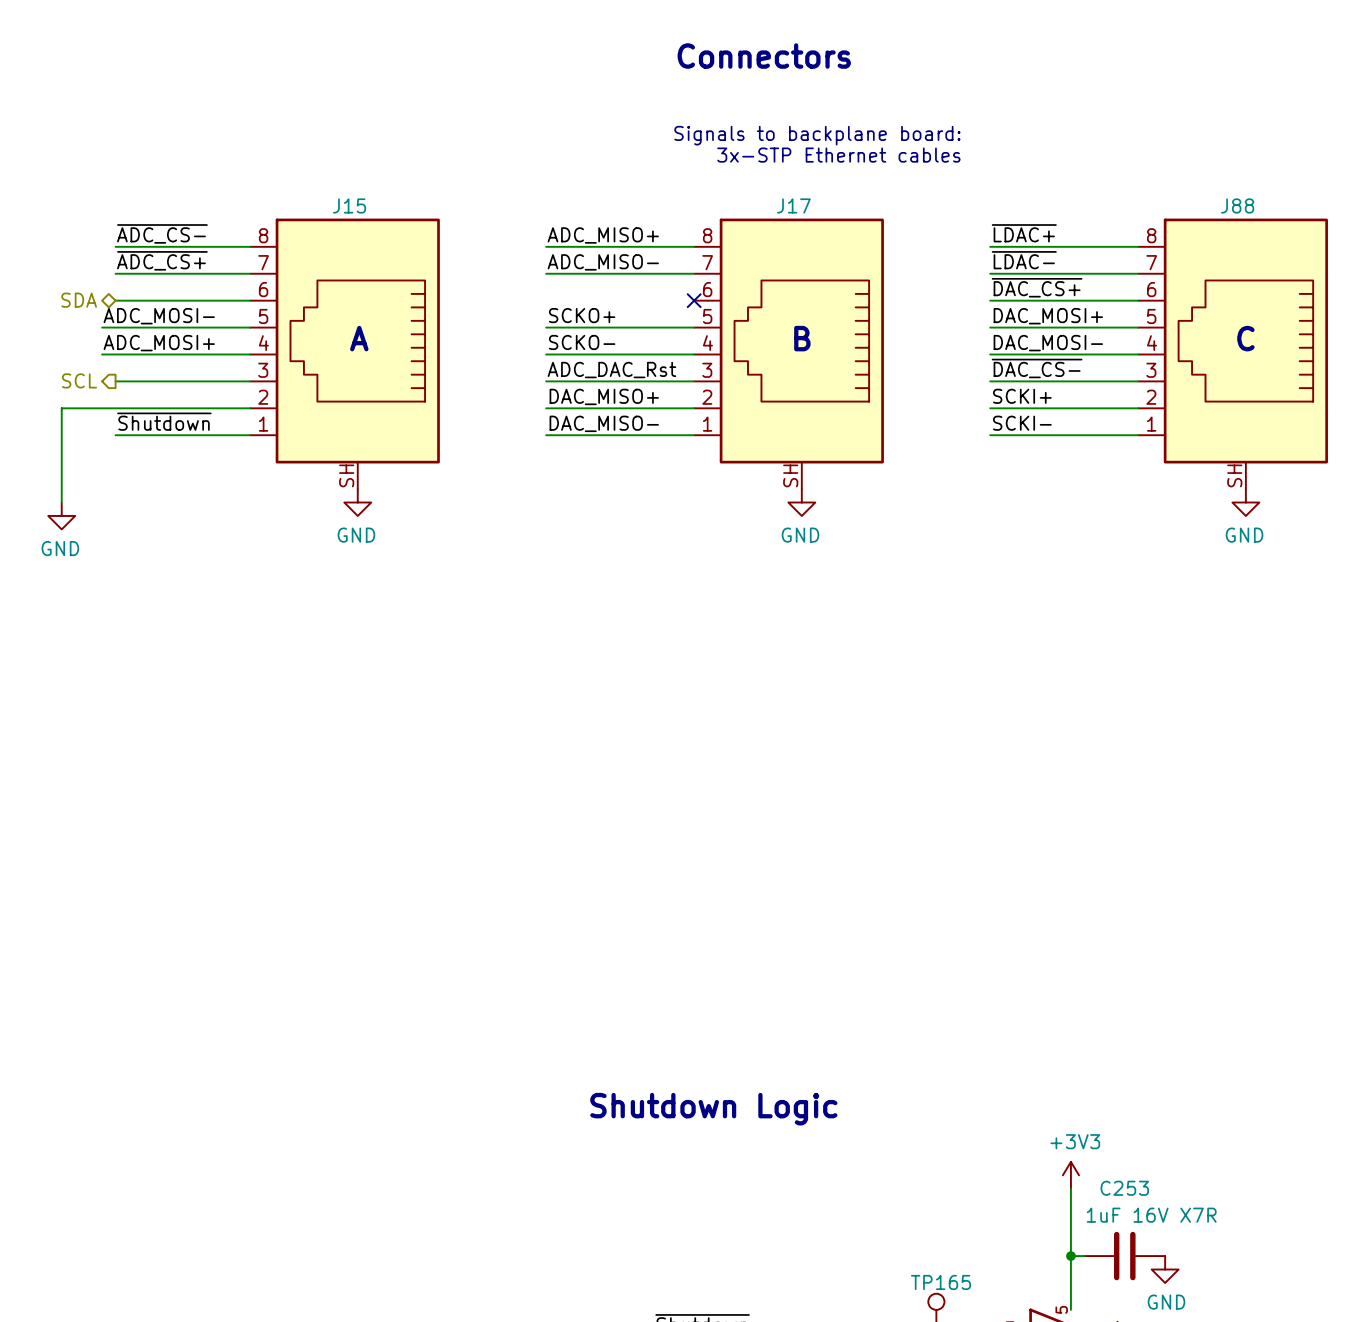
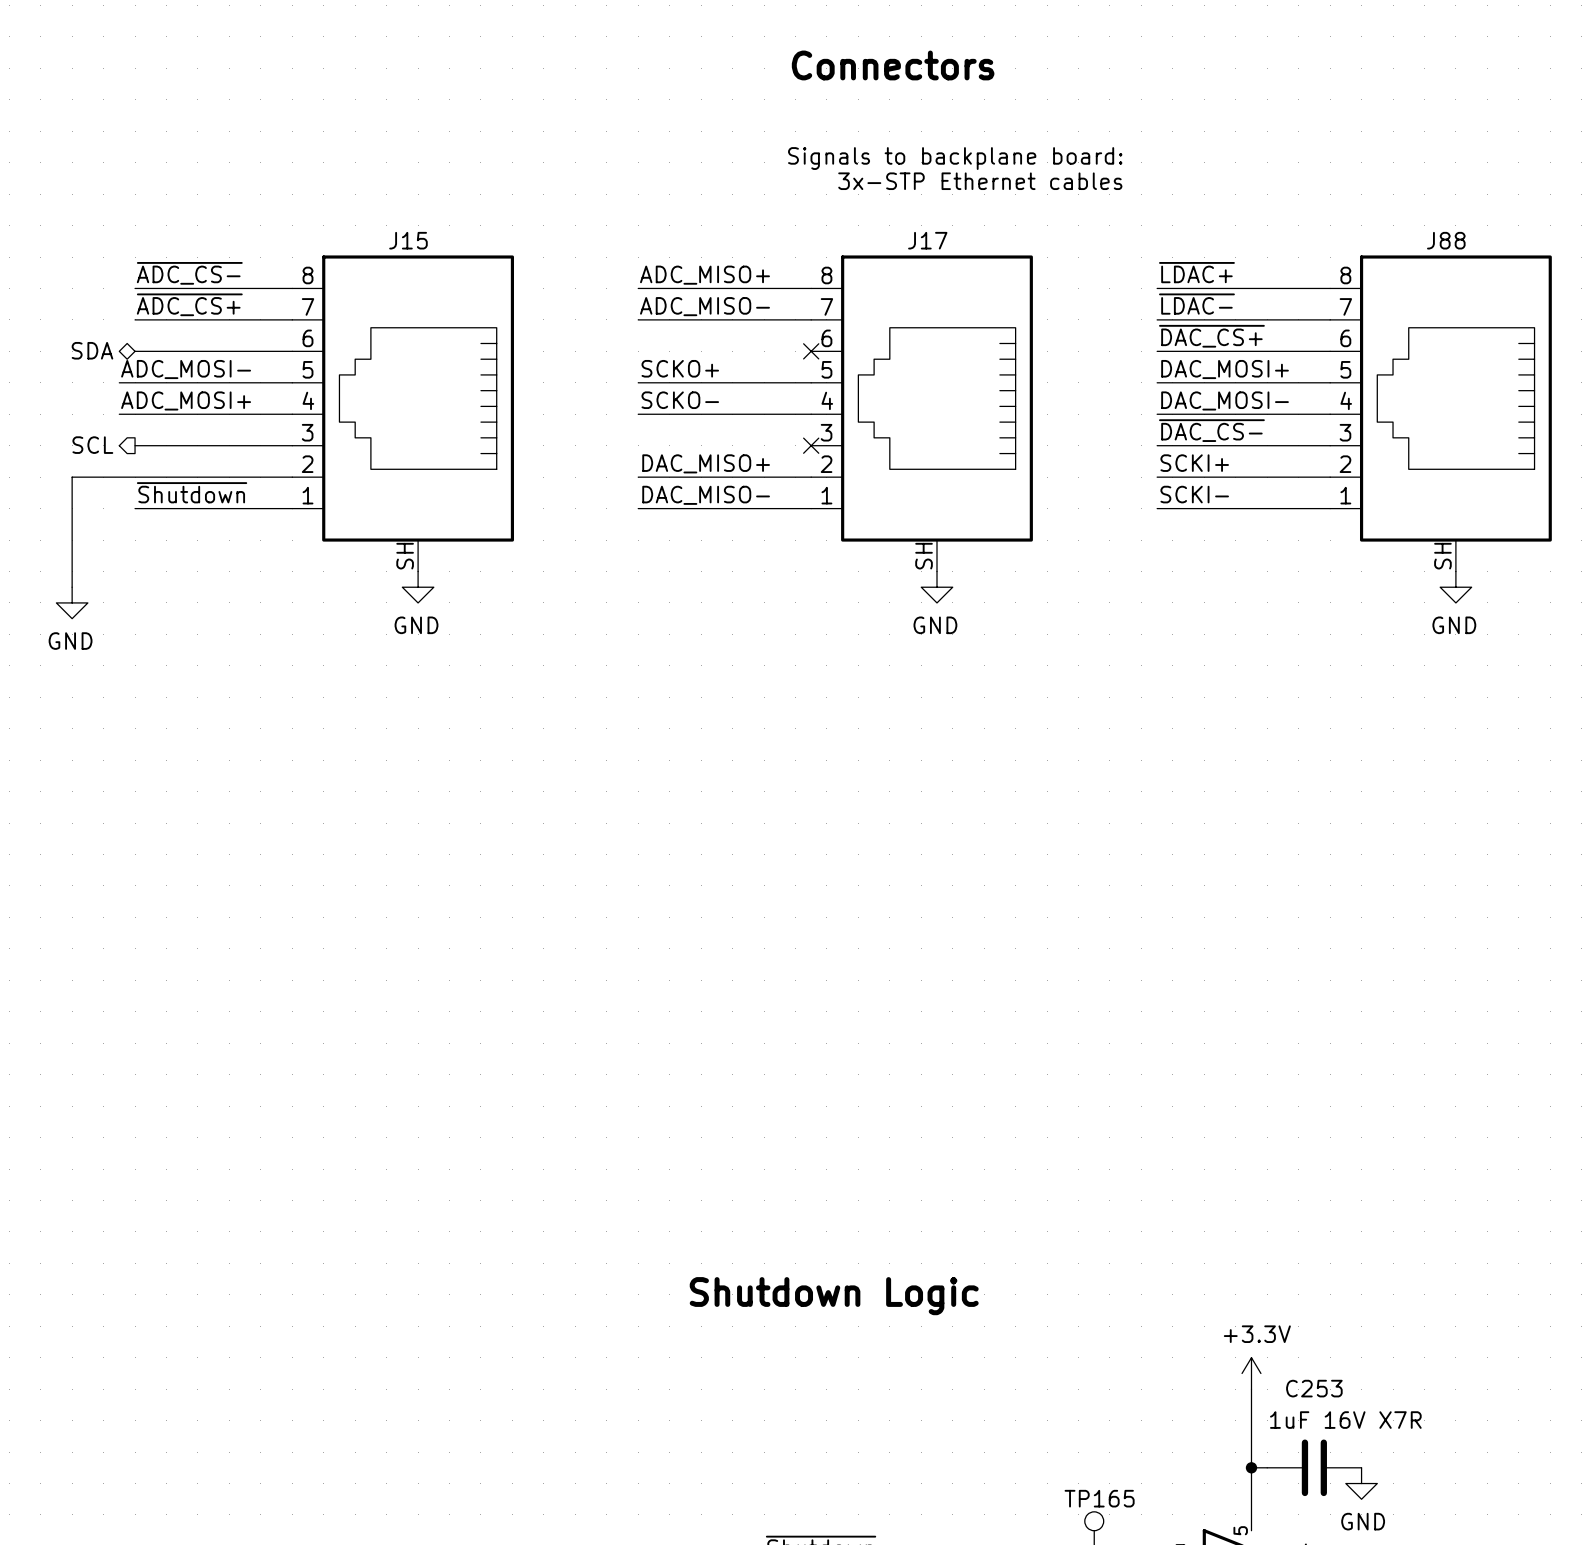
text: A (359, 338) -> none
text: B (802, 338) -> none
text: C (1245, 338) -> none
label: ADC_DAC_Rst (611, 370) -> none
wire: (546, 381) (694, 381) -> none
no-connect mark: none -> (811, 445)
power symbol: +3V3 (1070, 1175) -> +3.3V (1251, 1373)

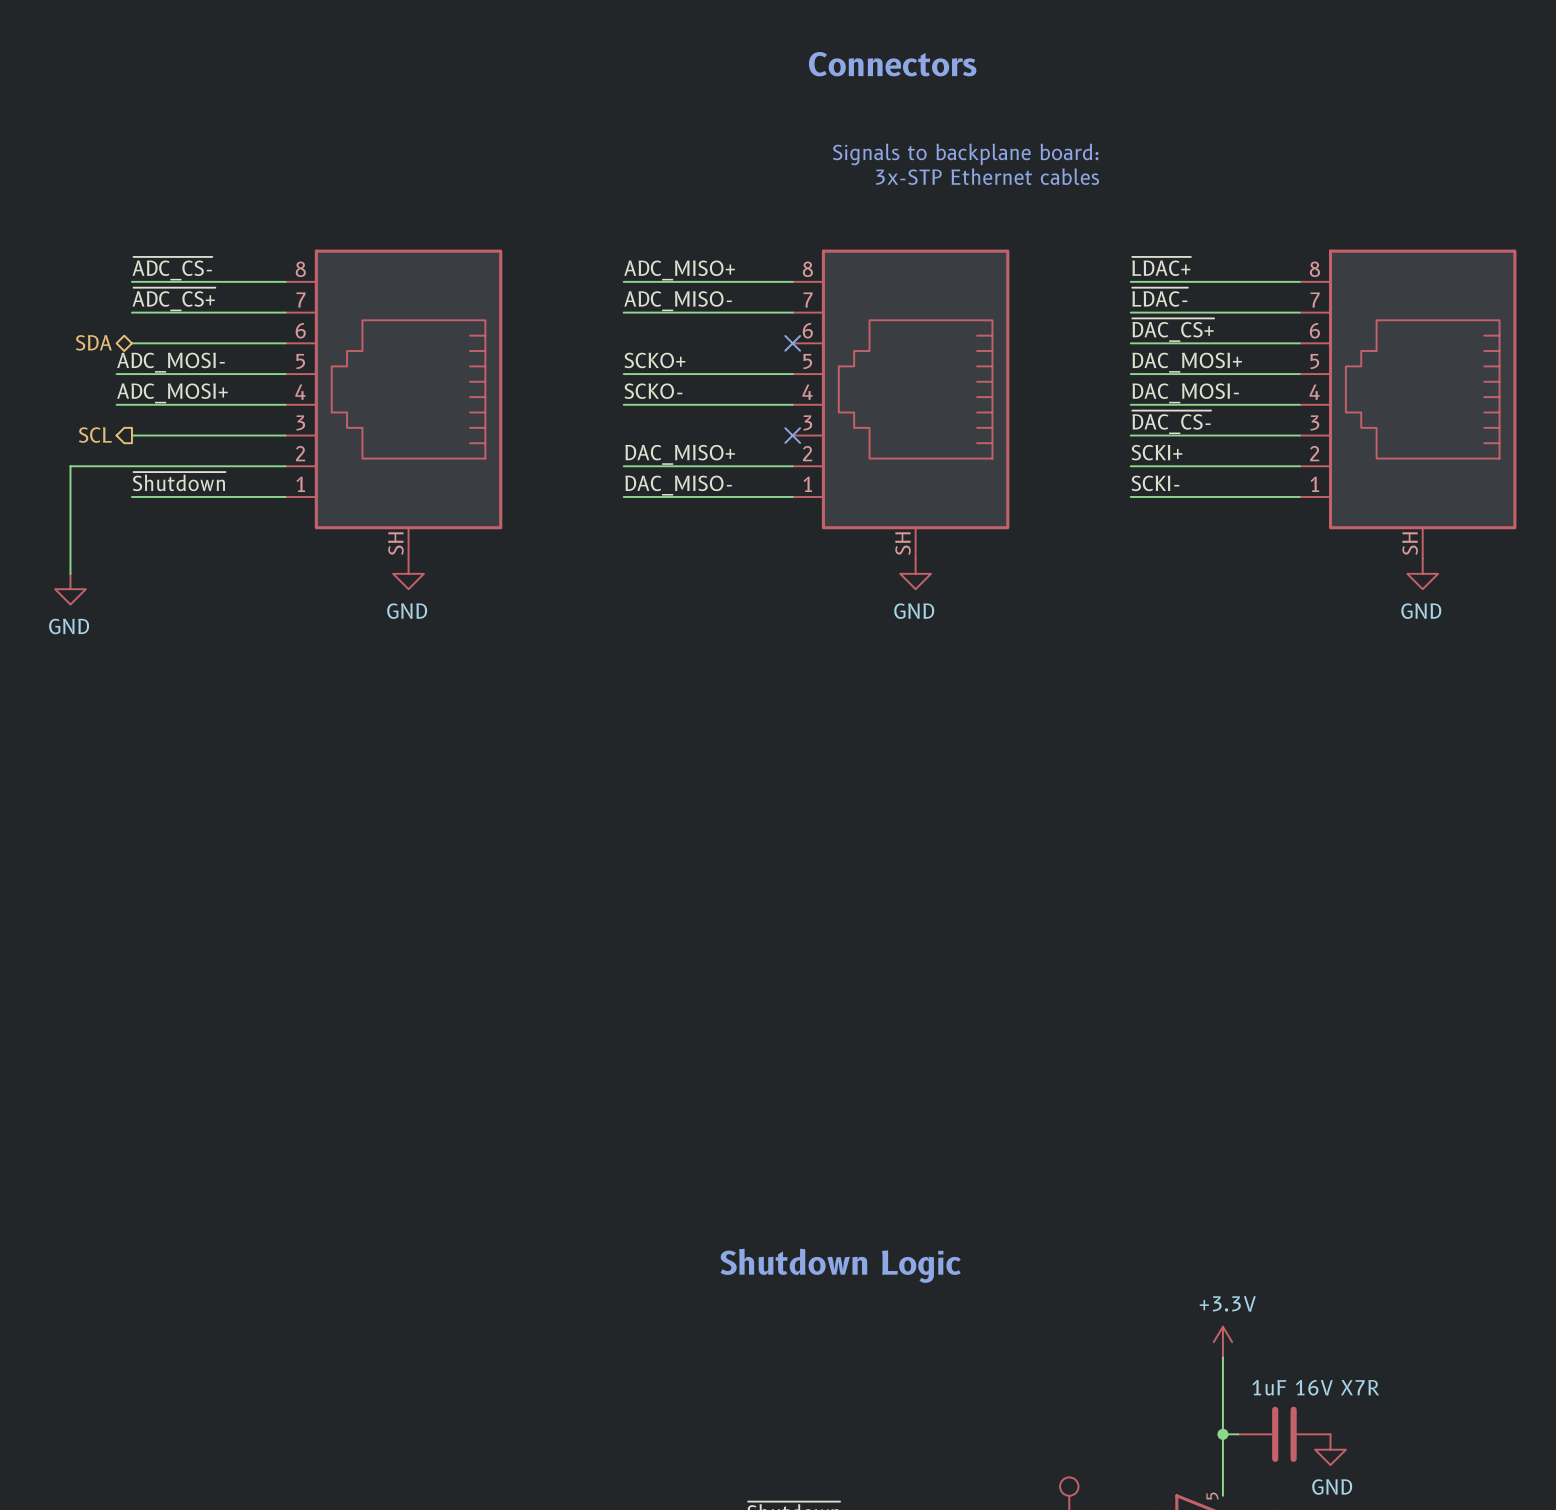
J15 name: J15 (408, 240) -> none
J17 name: J17 (927, 240) -> none
J88 name: J88 (1446, 240) -> none
C253 name: C253 (1314, 1388) -> none
TP165 name: TP165 (1099, 1498) -> none

